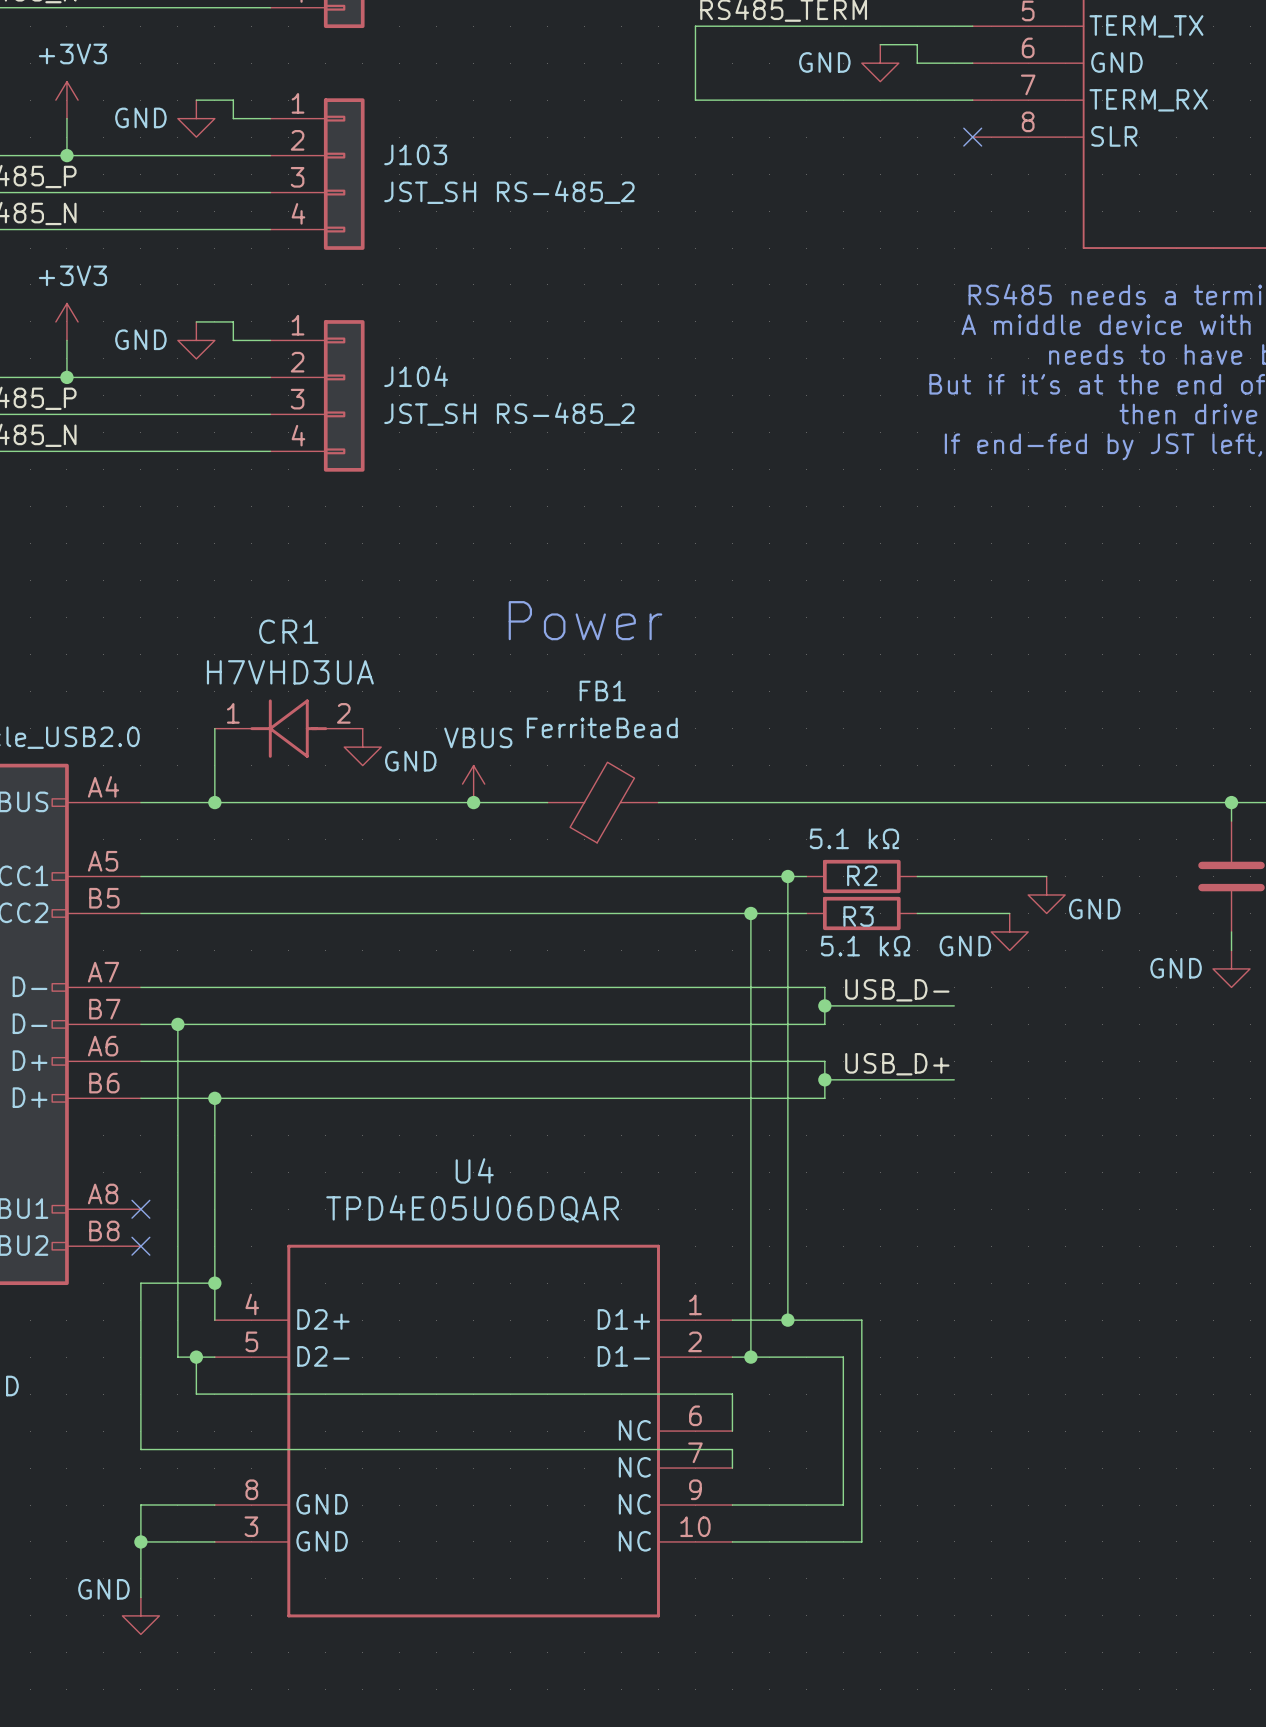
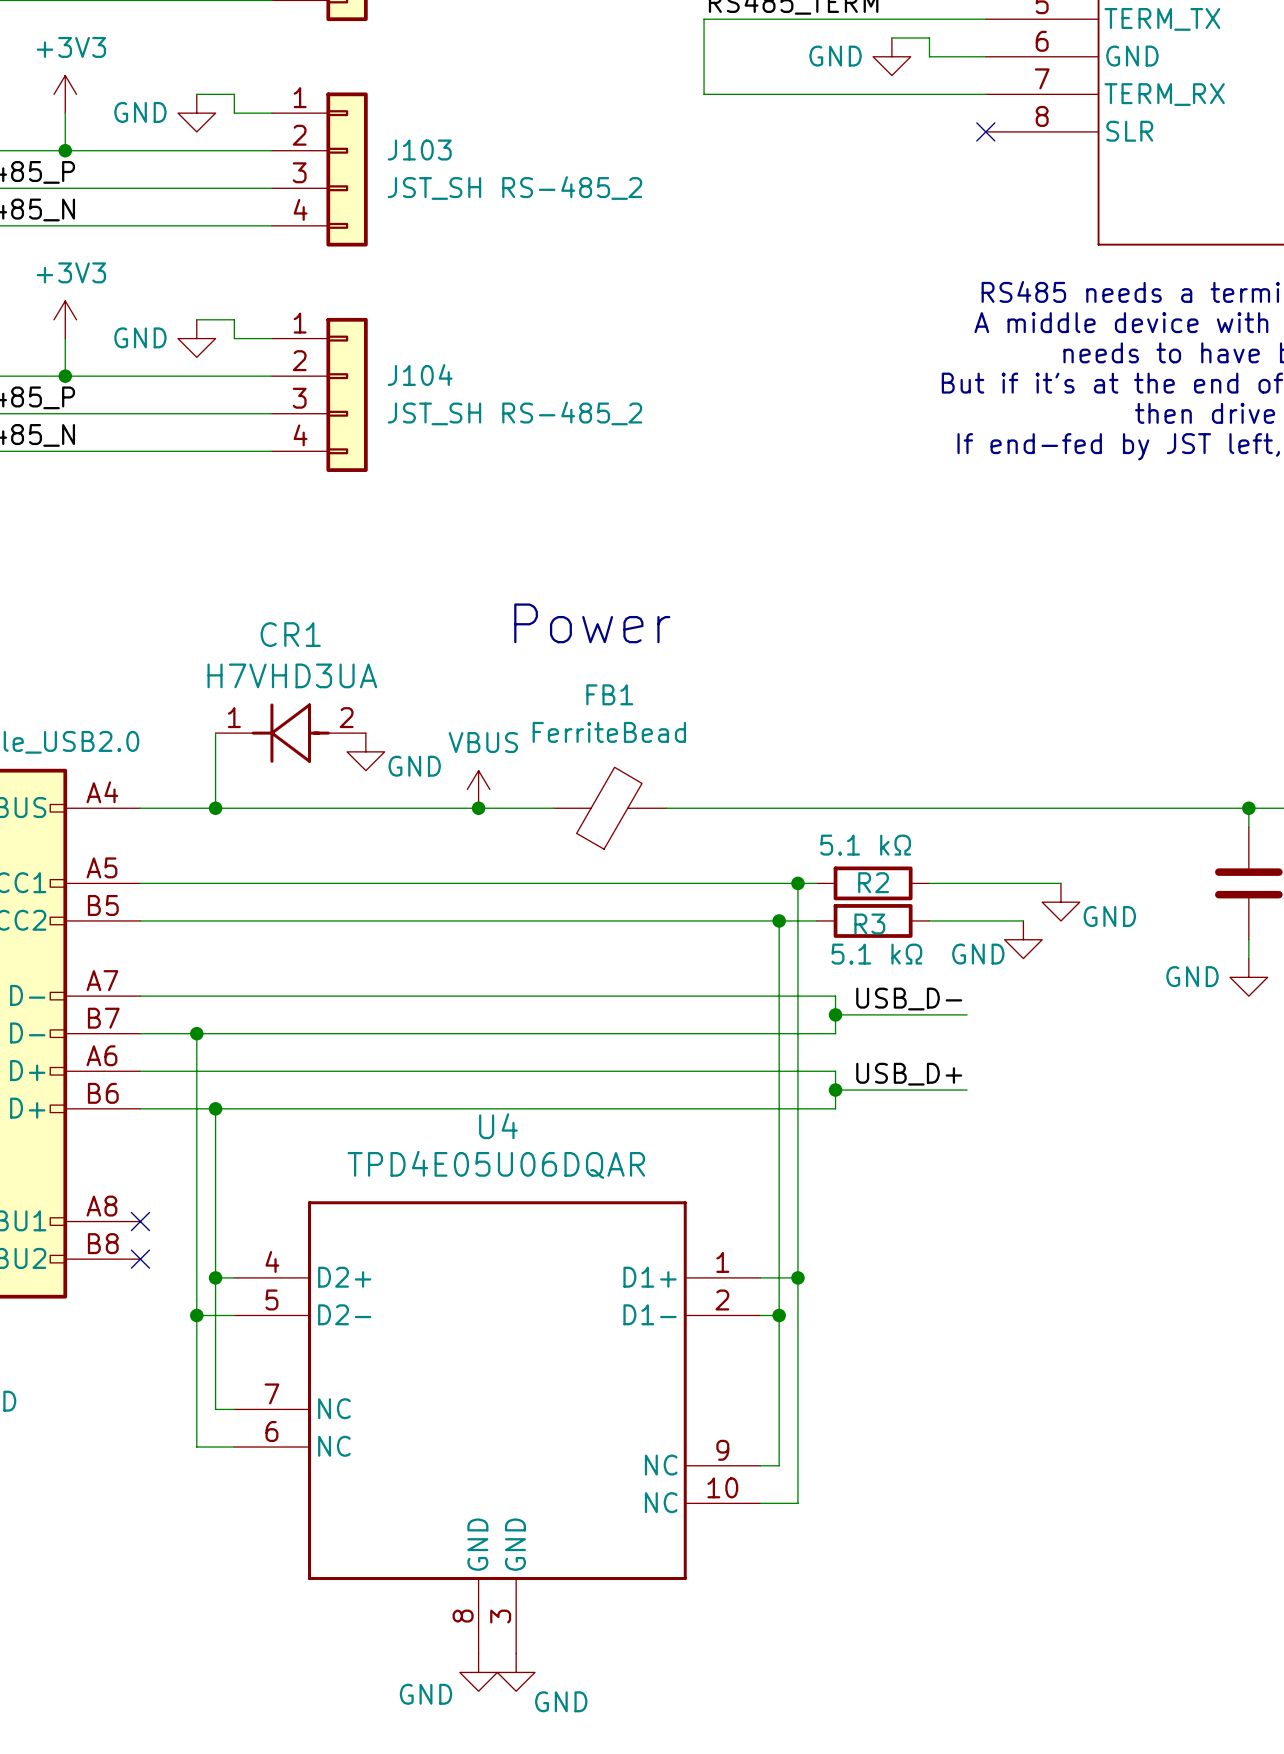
wire: (750, 913) (750, 1357) -> none
junction position: (750, 913) -> (779, 920)
wire: none -> (779, 920) (779, 1465) (760, 1465)
wire: (177, 1024) (177, 1357) (214, 1357) -> none
junction position: (177, 1024) -> (196, 1033)
wire: none -> (196, 1033) (196, 1371)
U4 name position: U4 (474, 1170) -> U4 (498, 1126)
U4 value position: TPD4E05U06DQAR (472, 1208) -> TPD4E05U06DQAR (496, 1164)
U4 symbol: [214, 1244, 733, 1618] -> [234, 1201, 761, 1654]
wire: none -> (215, 1277) (234, 1277)
junction: none -> (215, 1277)
wire: none -> (760, 1277) (797, 1277)
junction: none -> (797, 1277)
wire: (214, 1283) (140, 1283) (140, 1449) (732, 1449) (732, 1468) -> none
junction: (214, 1283) -> none
wire: none -> (196, 1315) (234, 1315)
junction: none -> (196, 1315)
wire: none -> (760, 1315) (779, 1315)
wire: none -> (215, 1334) (215, 1409)
wire: (732, 1320) (861, 1320) (861, 1541) (732, 1541) -> none
wire: none -> (797, 1334) (797, 1503) (760, 1503)
junction position: (787, 1320) -> (779, 1315)
junction: (196, 1357) -> none
wire: (732, 1357) (843, 1357) (843, 1505) (732, 1505) -> none
junction: (750, 1357) -> none
wire: (196, 1394) (214, 1394) -> (196, 1409) (196, 1447) (234, 1447)
wire: (233, 1394) (732, 1394) (732, 1431) -> none
wire: (214, 1505) (140, 1505) (140, 1597) -> none
wire: (140, 1541) (214, 1541) -> none
junction: (140, 1541) -> none
power symbol: GND (140, 1615) -> none
power symbol: none -> GND (478, 1672)
power symbol: none -> GND (516, 1672)

